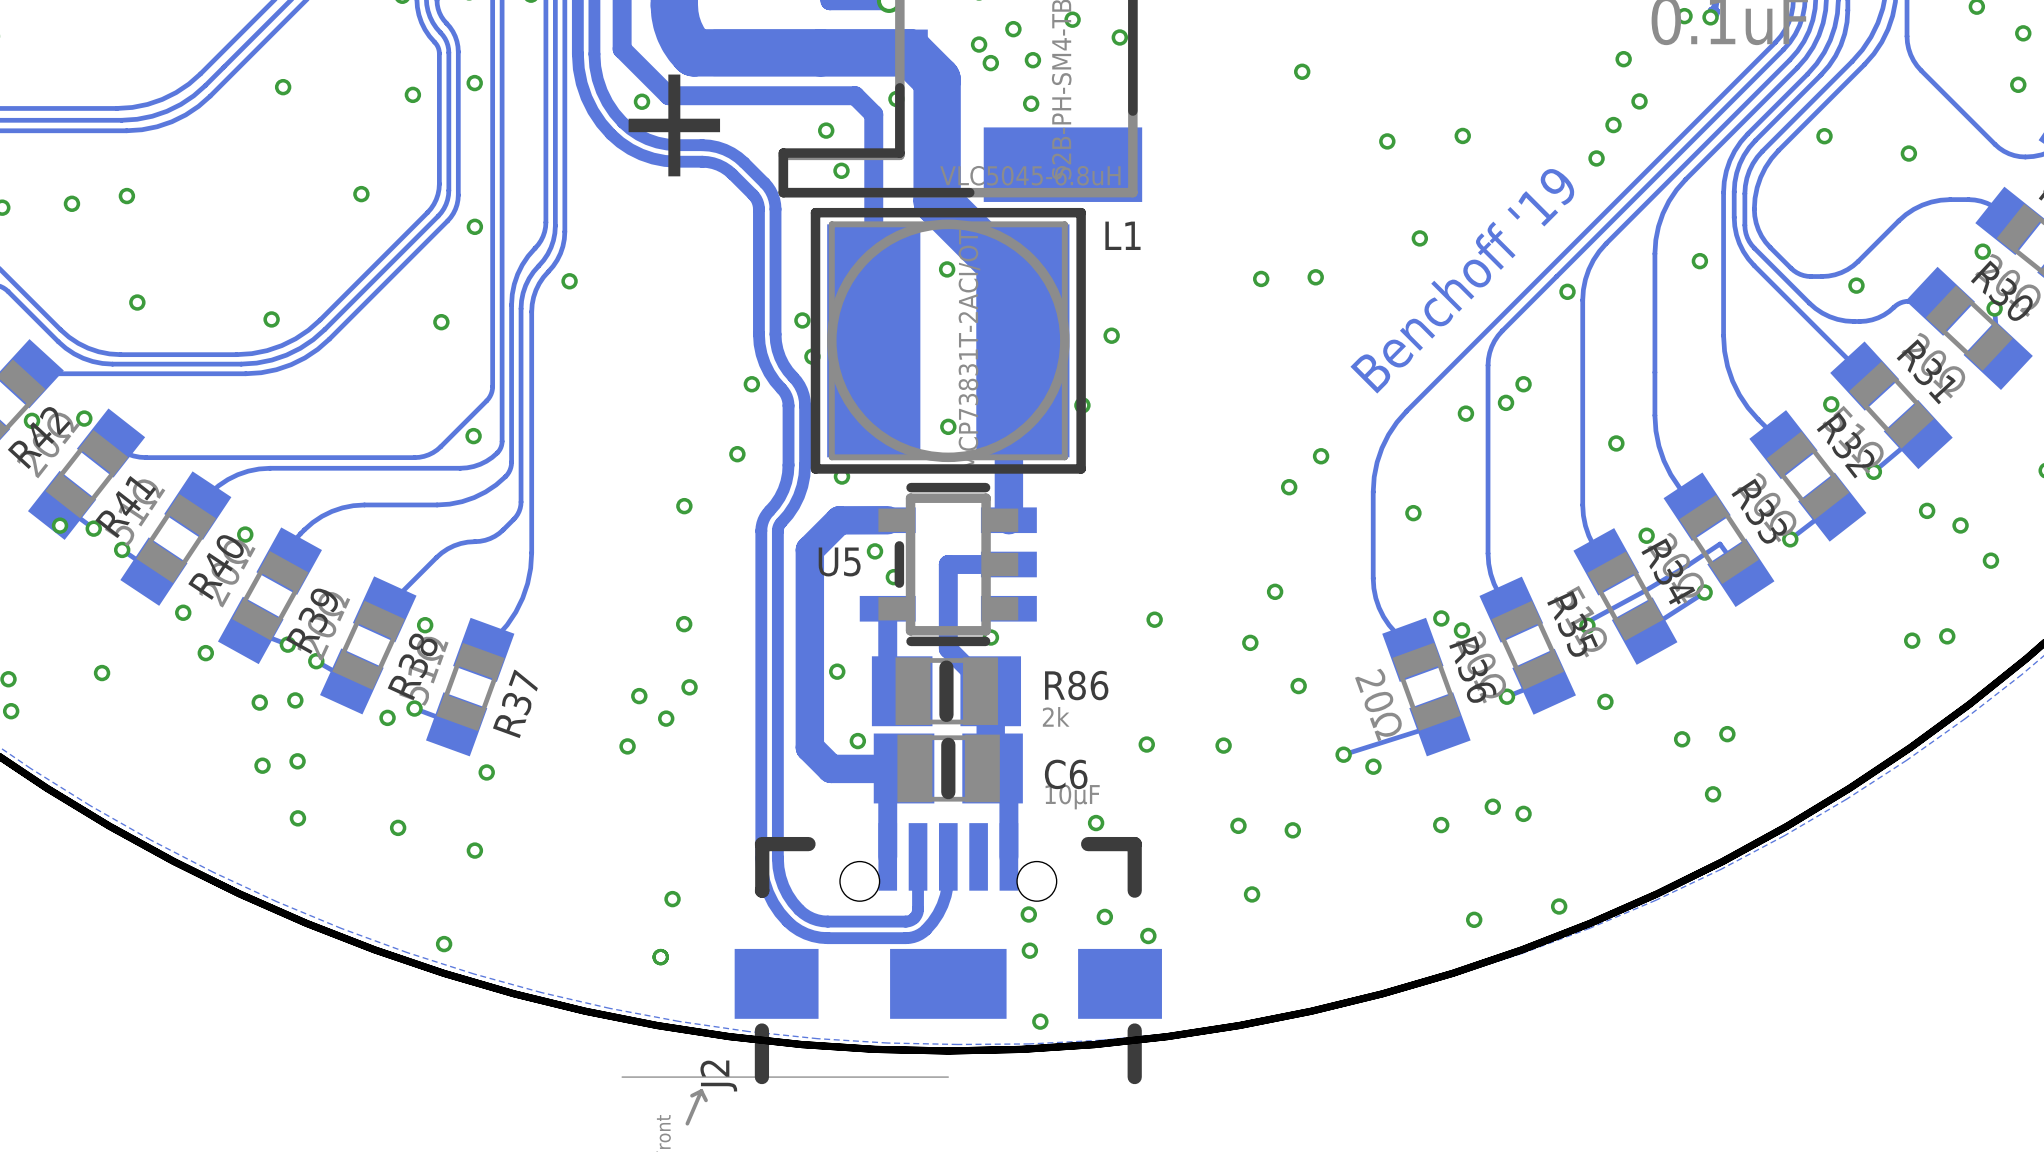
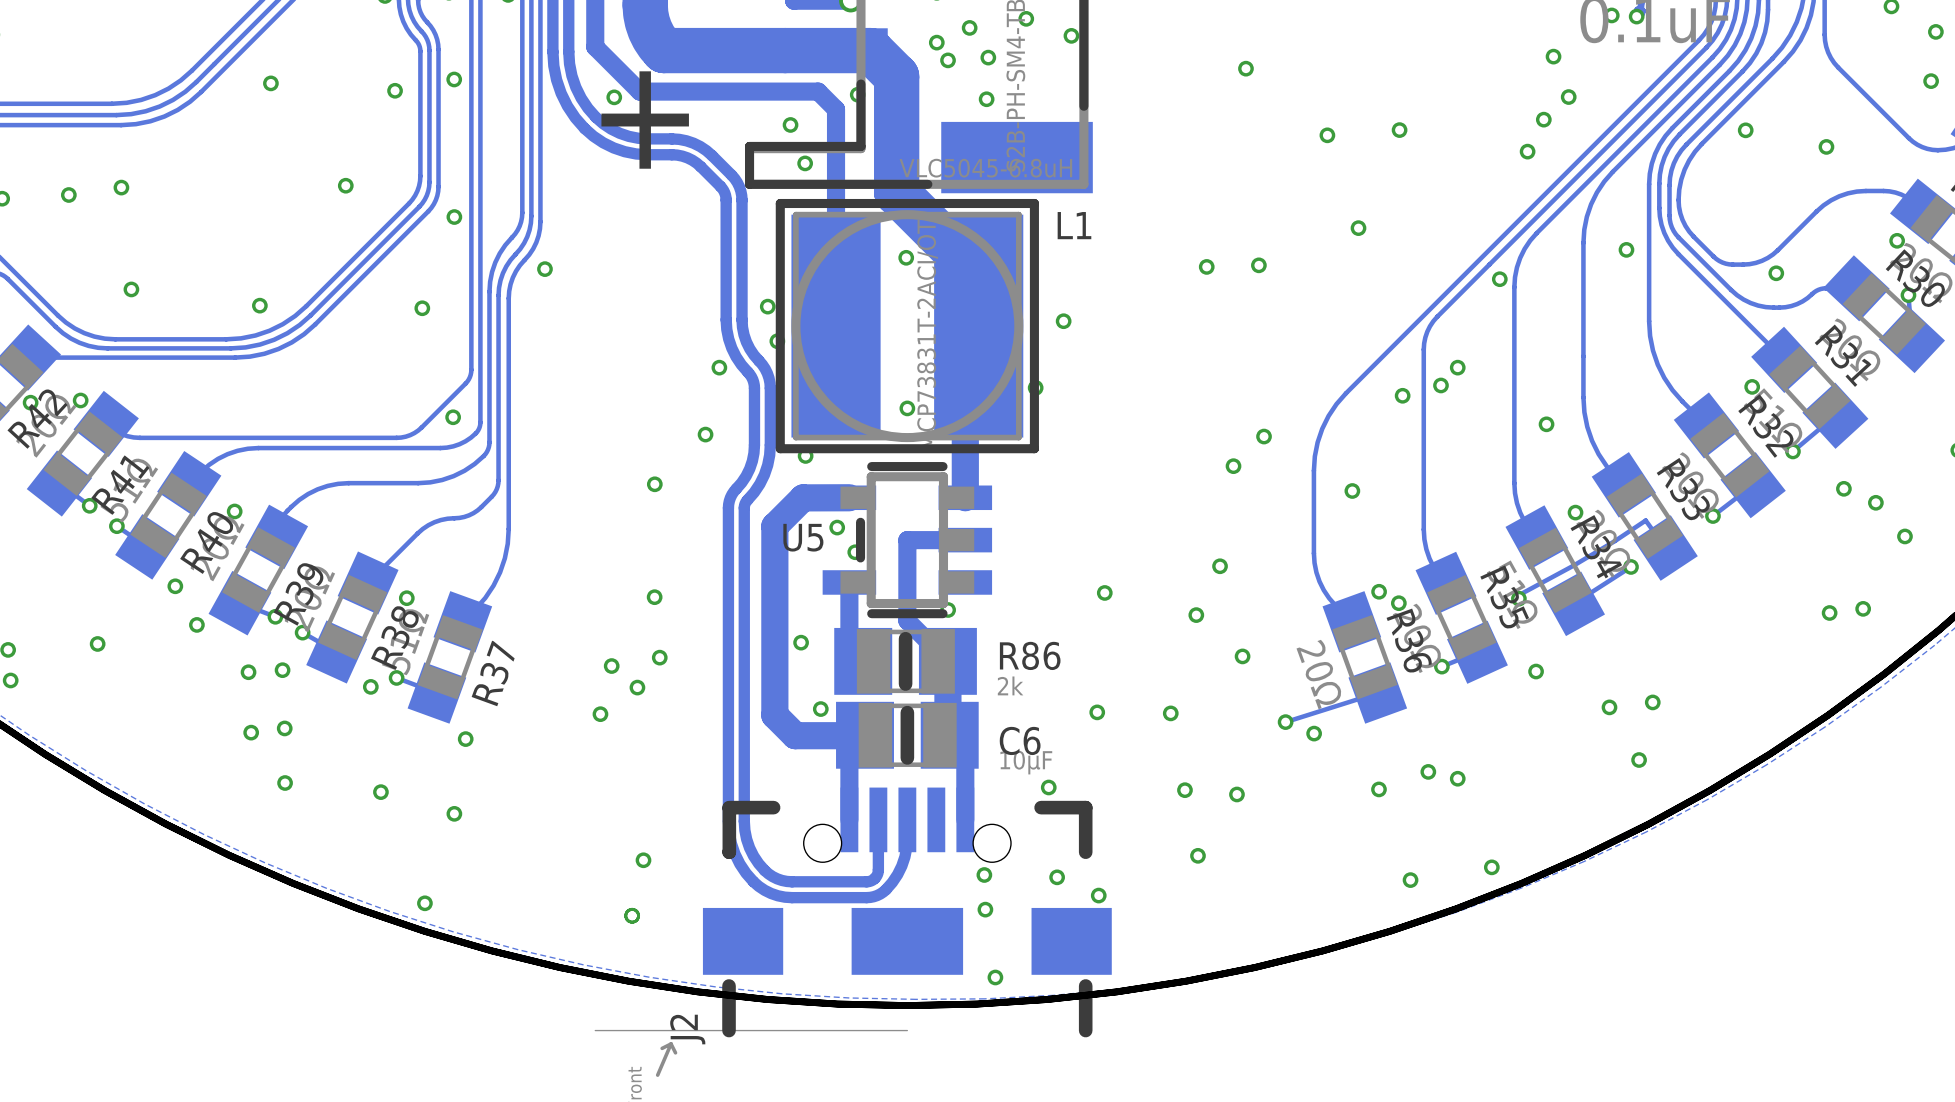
text: Benchoff '19 (1462, 280) -> none
via: (60, 525) -> none

